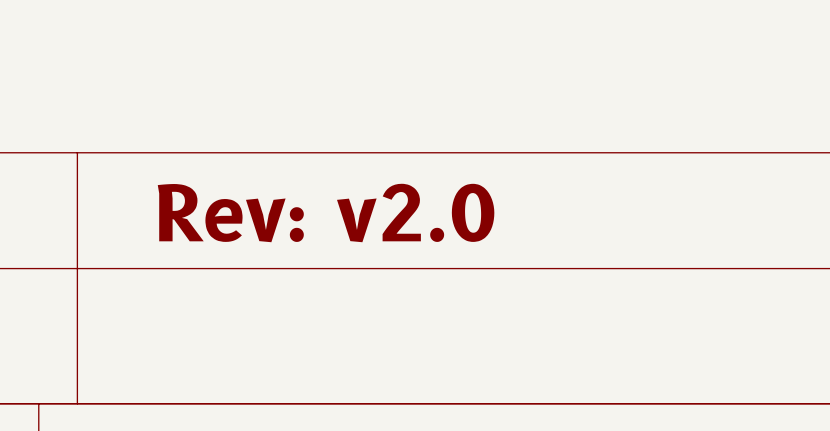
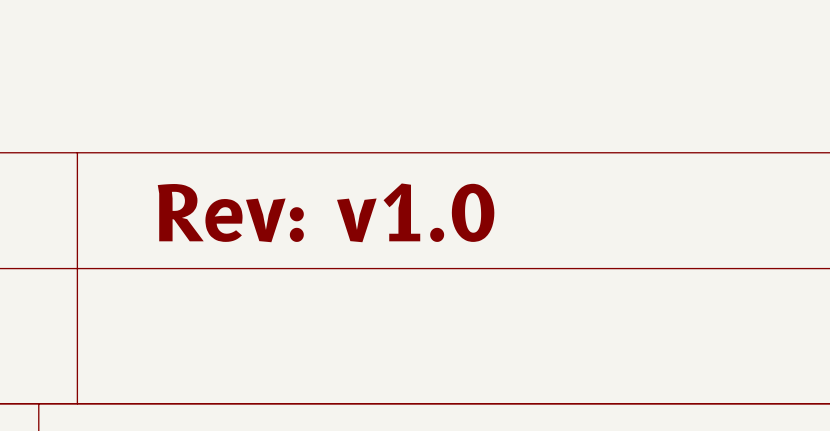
title block: Rev: v2.0 (326, 213) -> Rev: v1.0 (326, 212)

